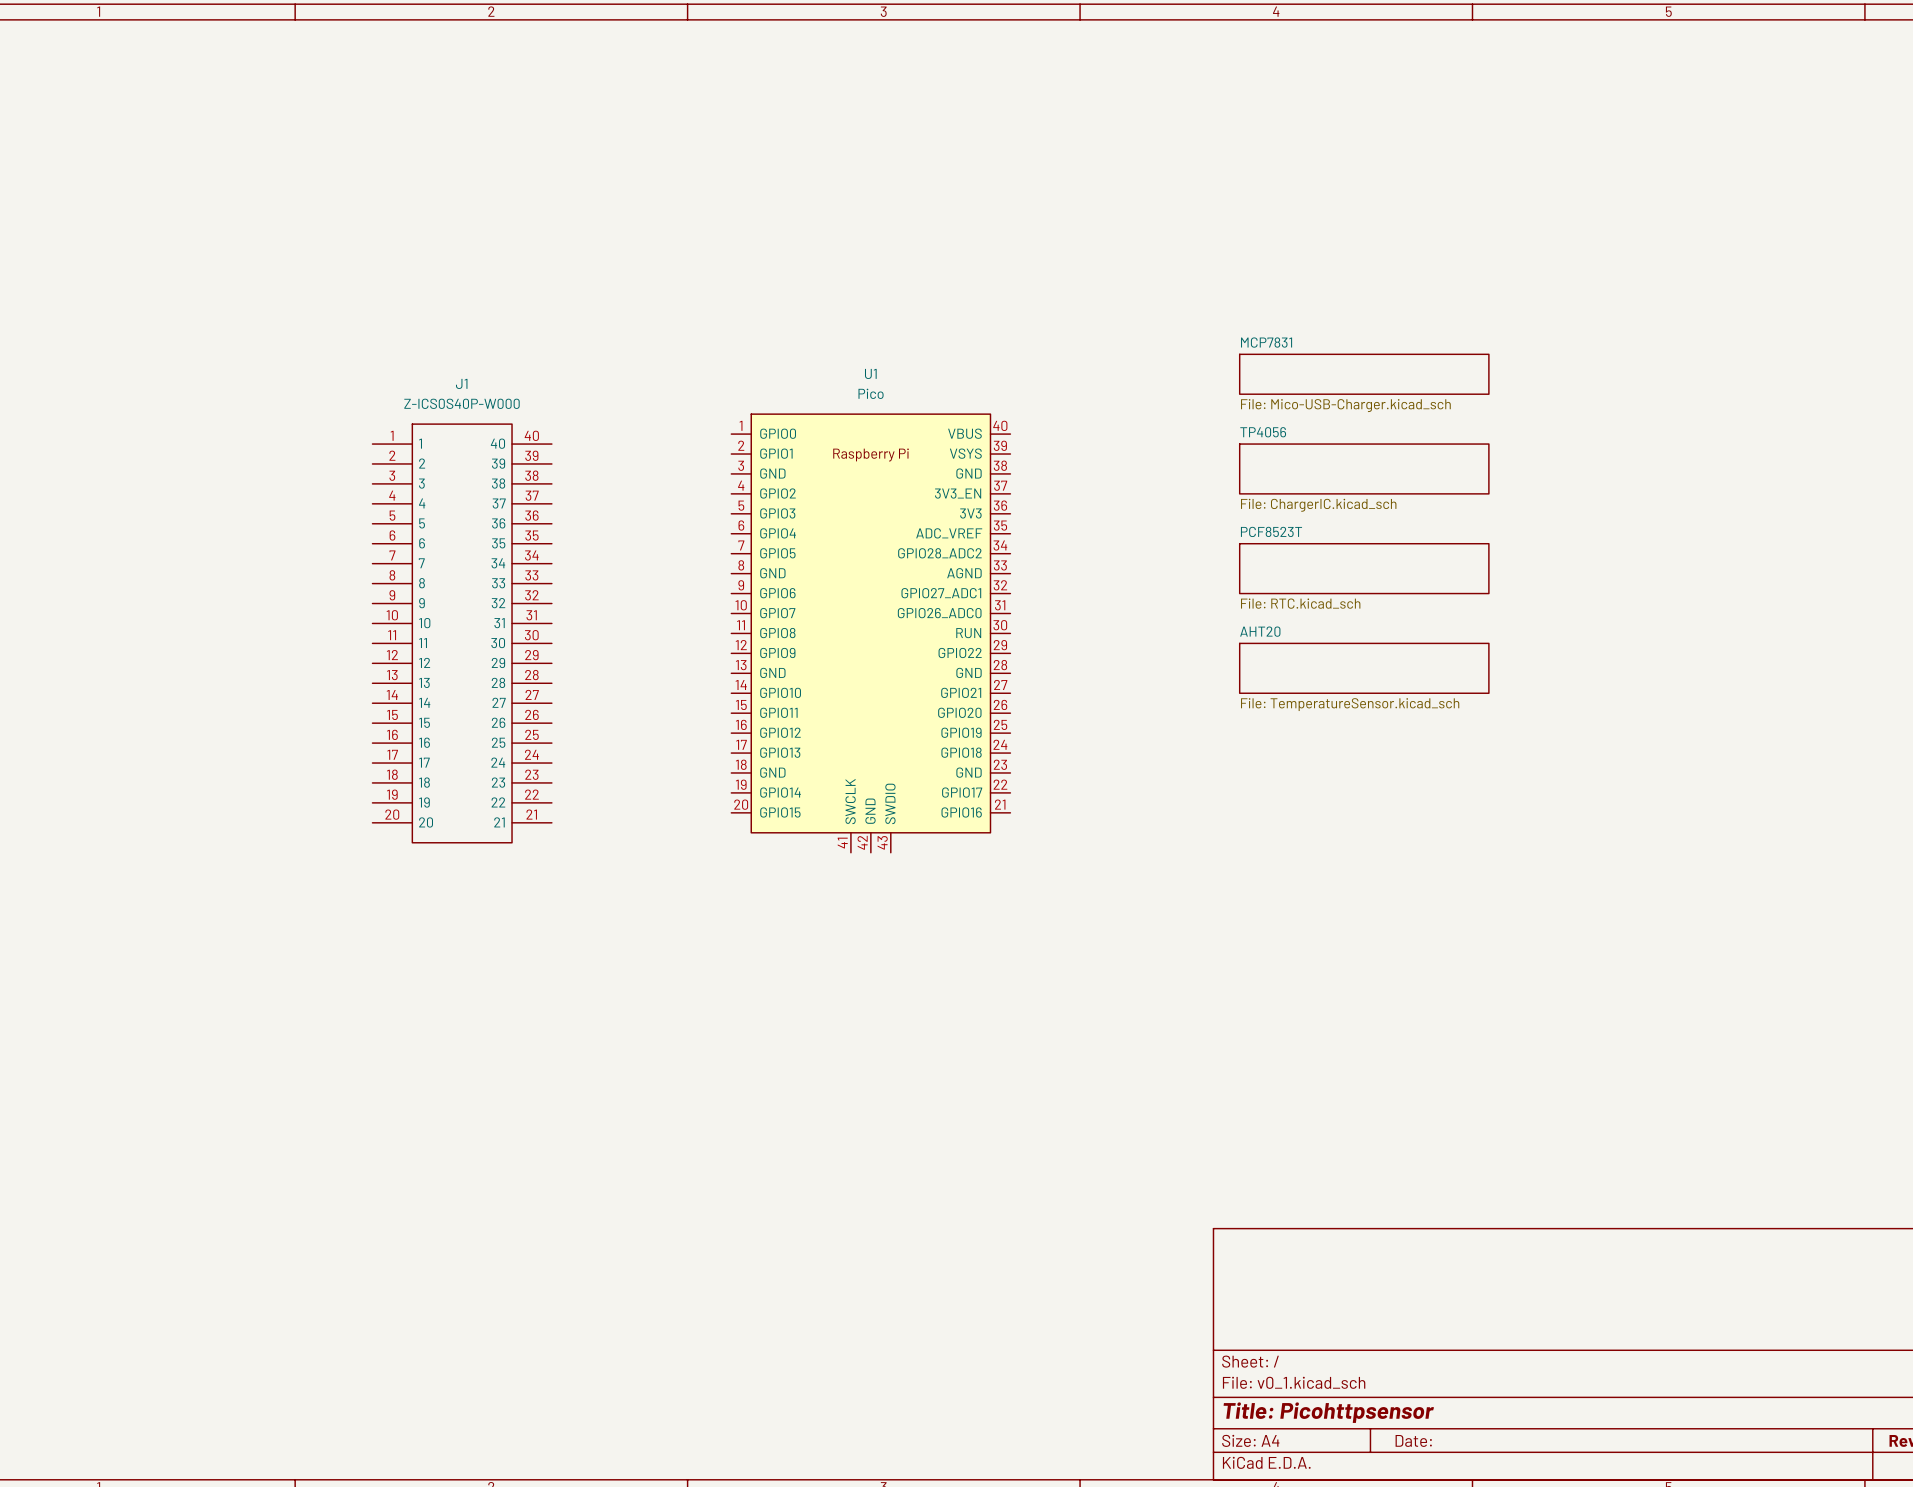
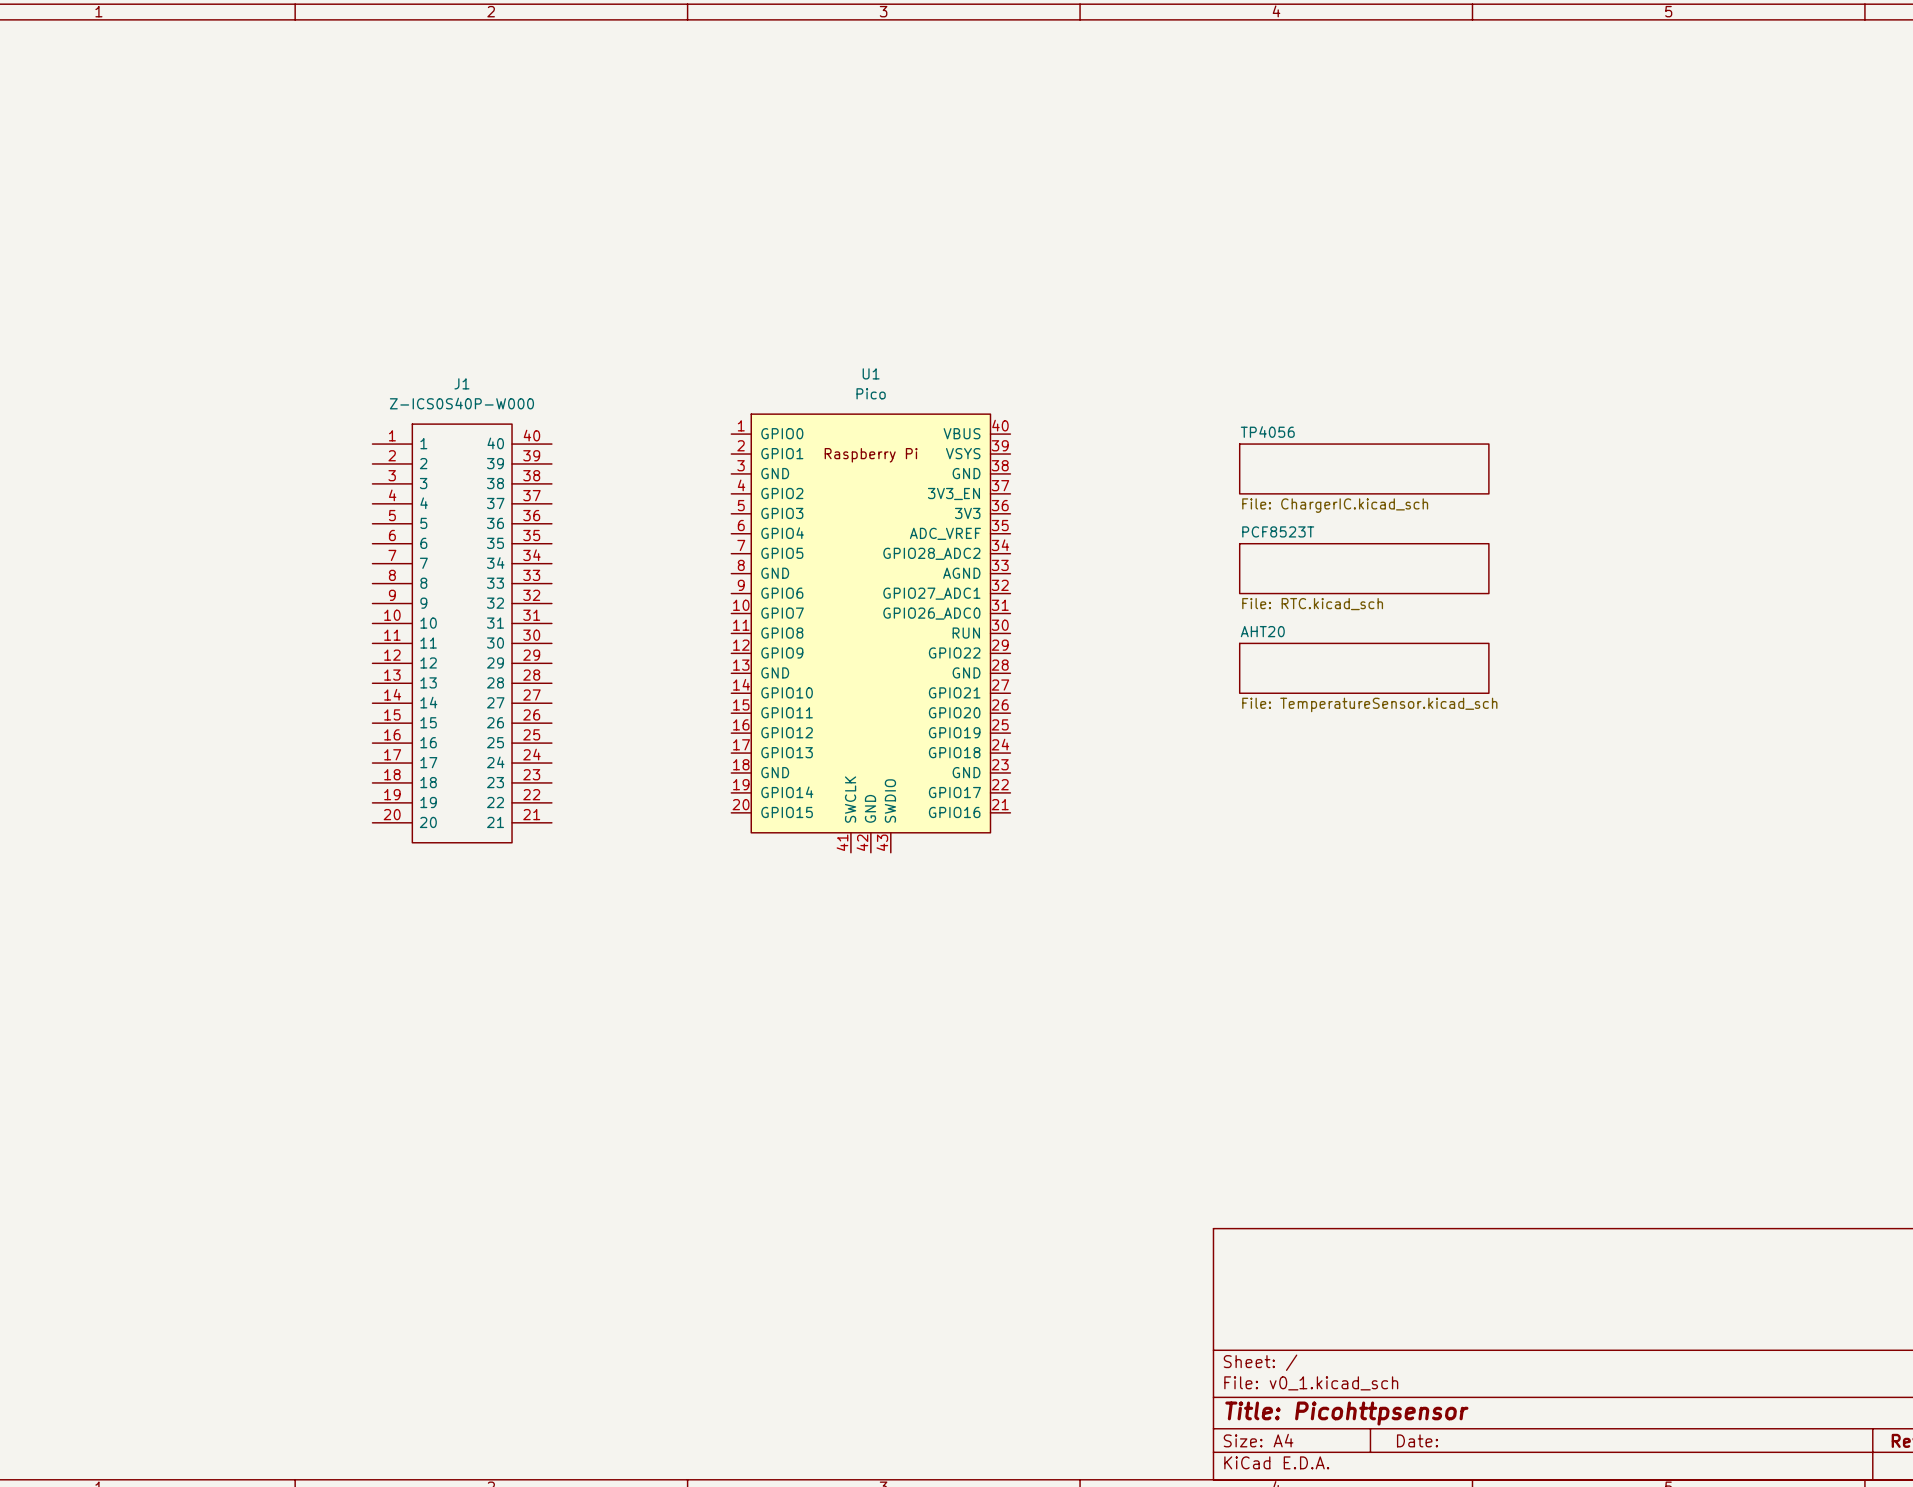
sheet MCP7831: File: Mico-USB-Charger.kicad_sch (1364, 374) -> none

